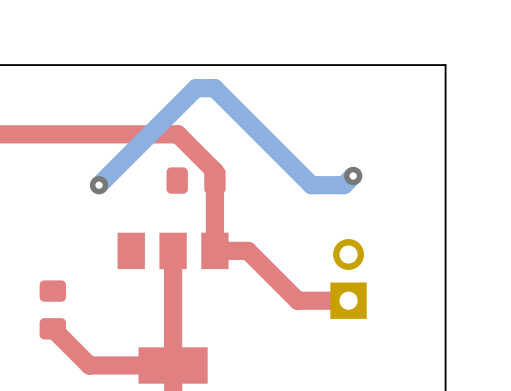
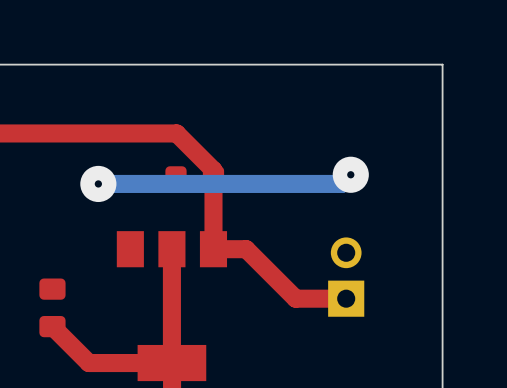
via size: [344, 166, 363, 186] -> [332, 156, 369, 193]
via size: [89, 176, 109, 195] -> [80, 165, 117, 203]
bottom track: (311, 185) (214, 88) (196, 88) (99, 185) -> (309, 183) (98, 183)

